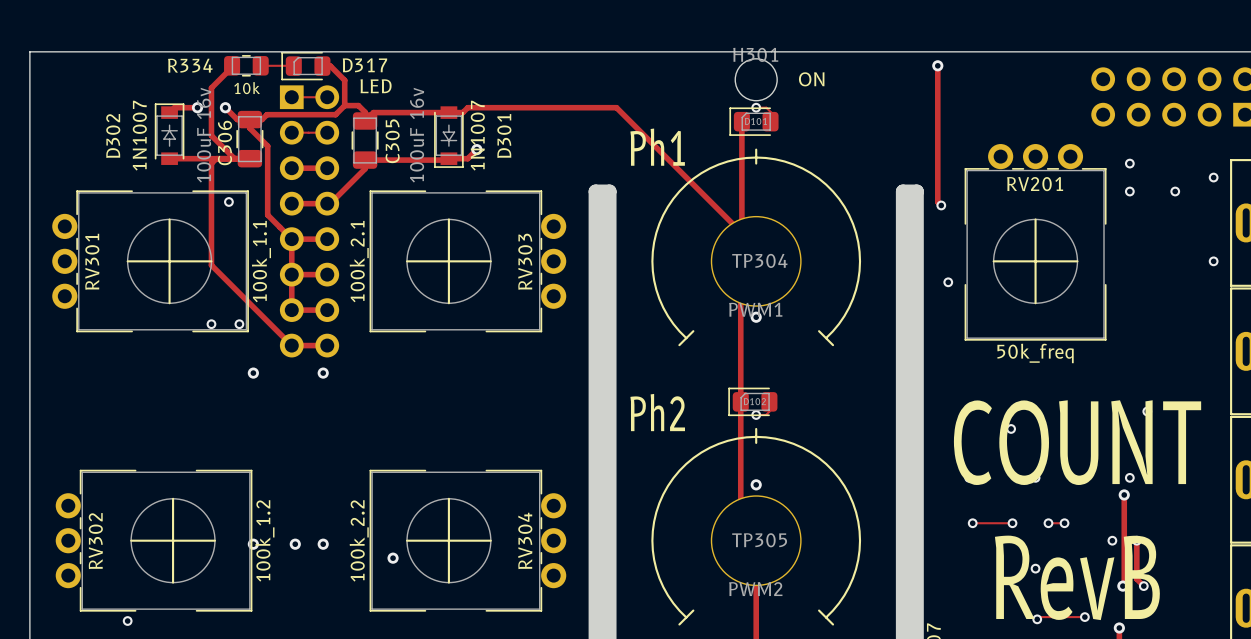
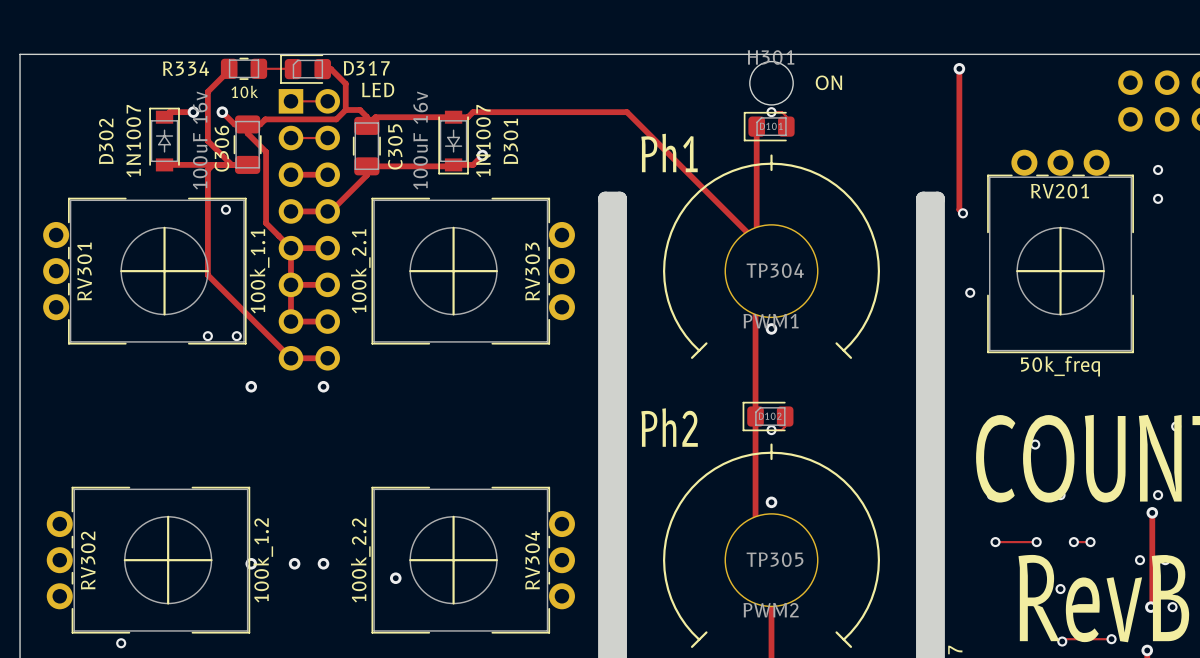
track: (1136, 540) (1136, 579) (1143, 586) -> none

